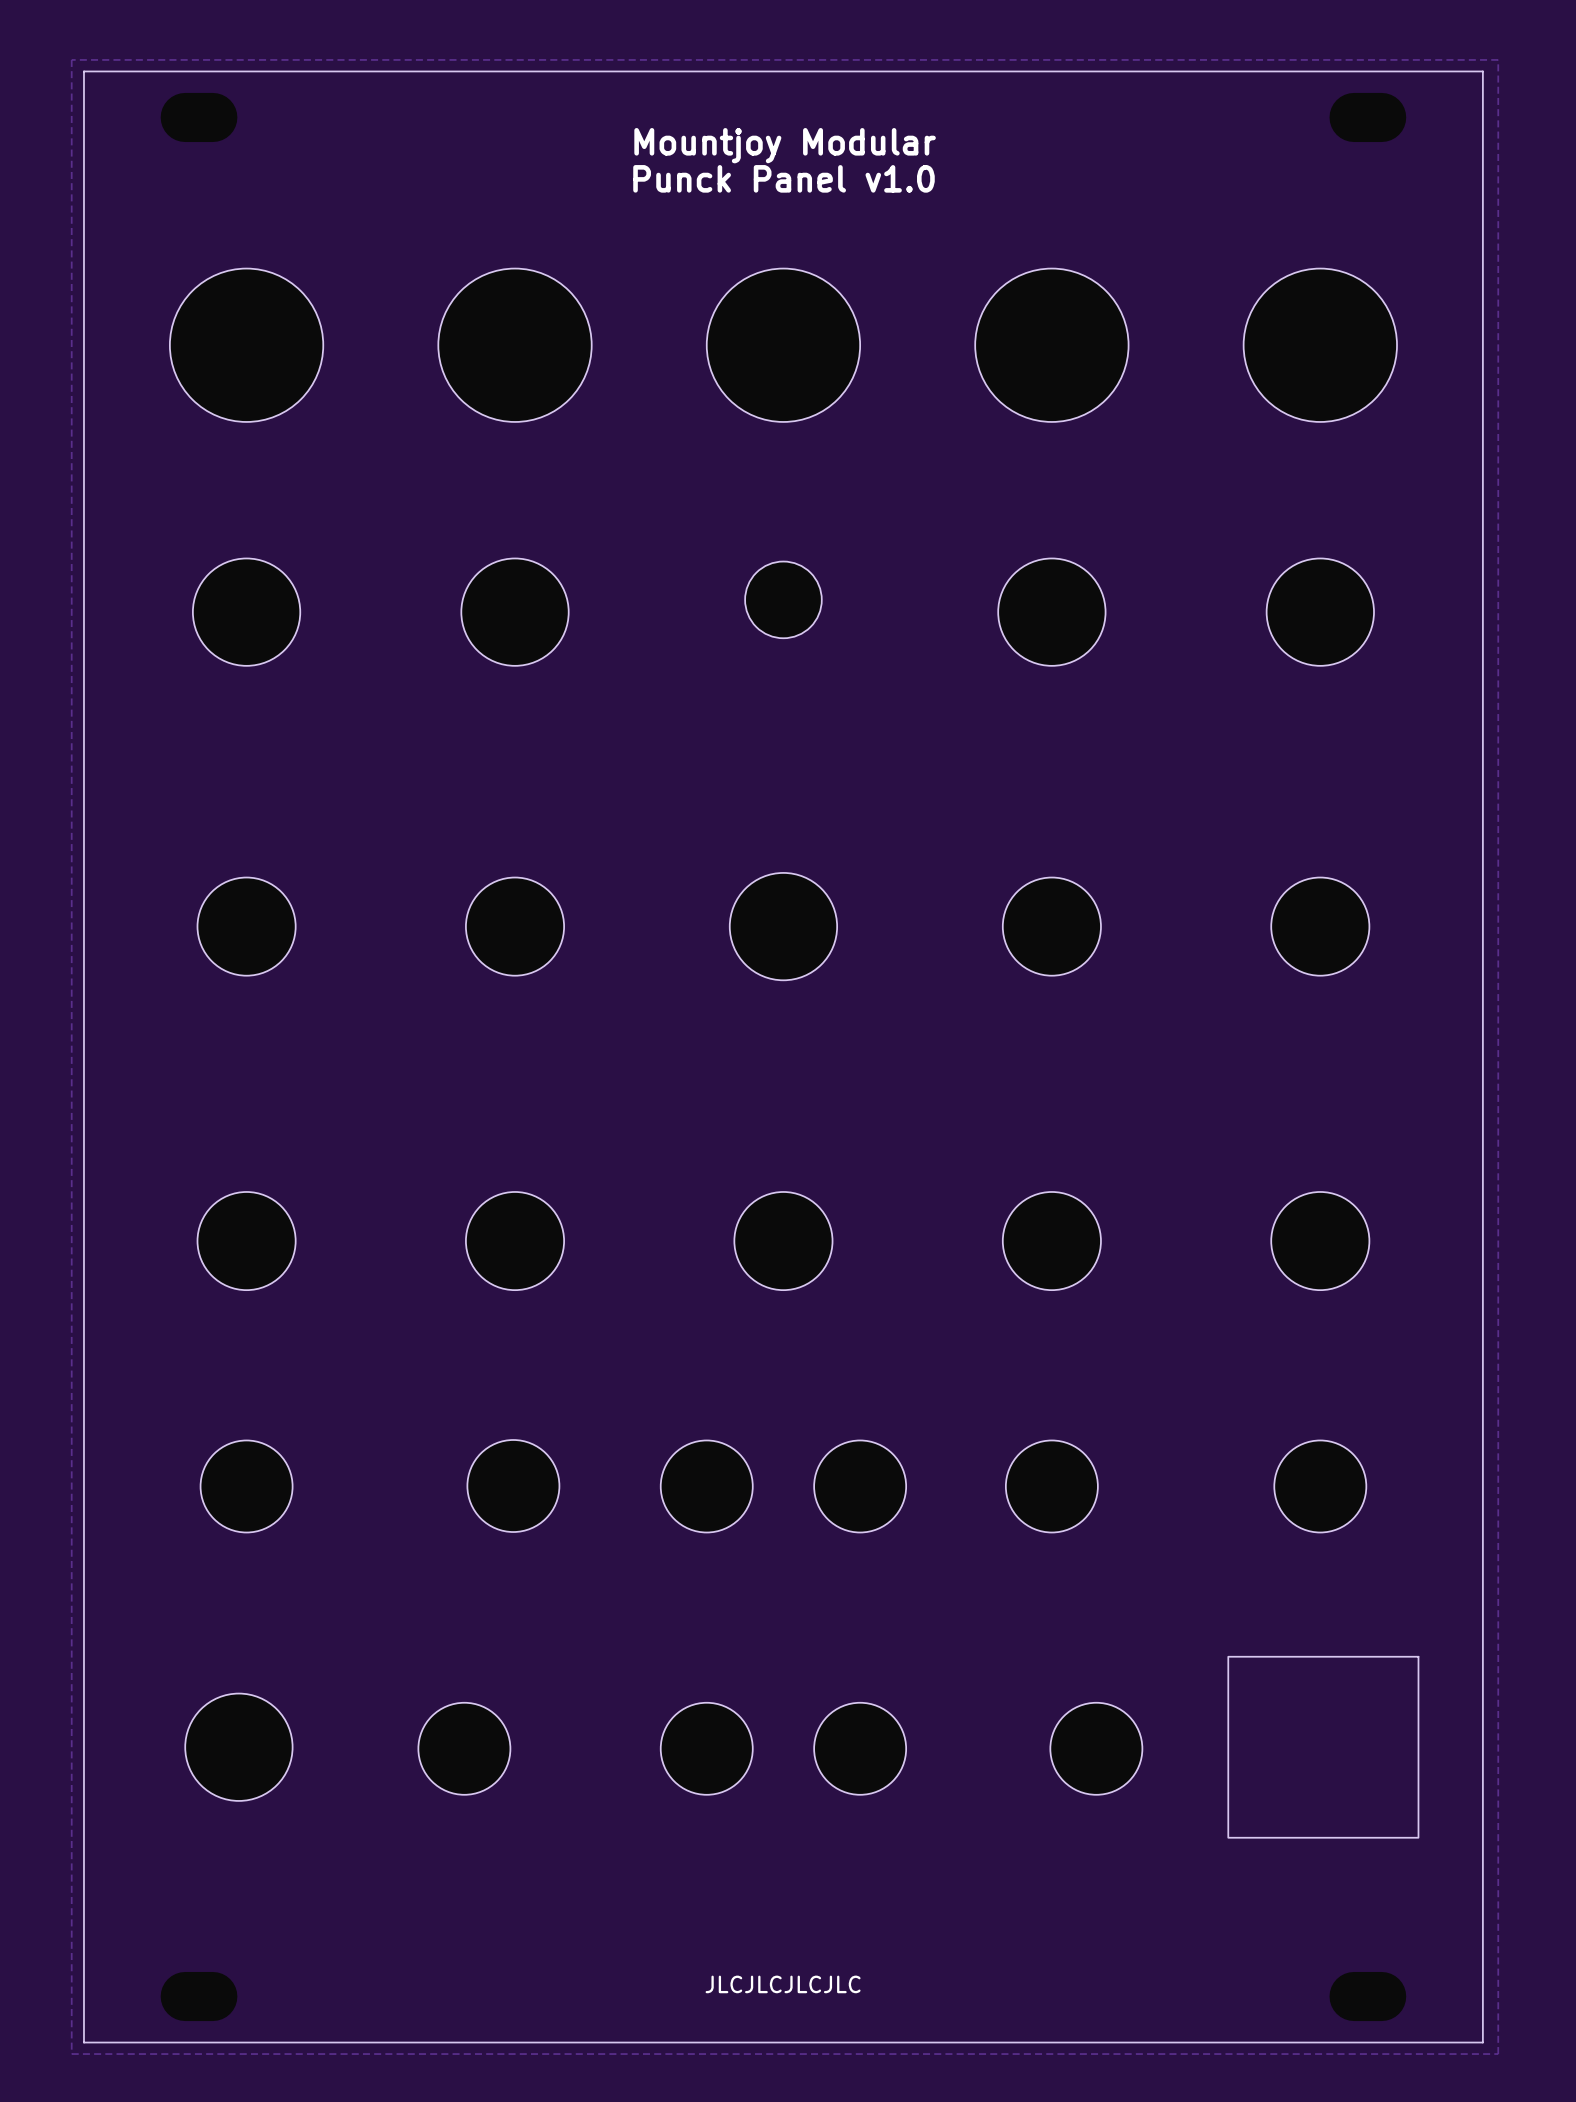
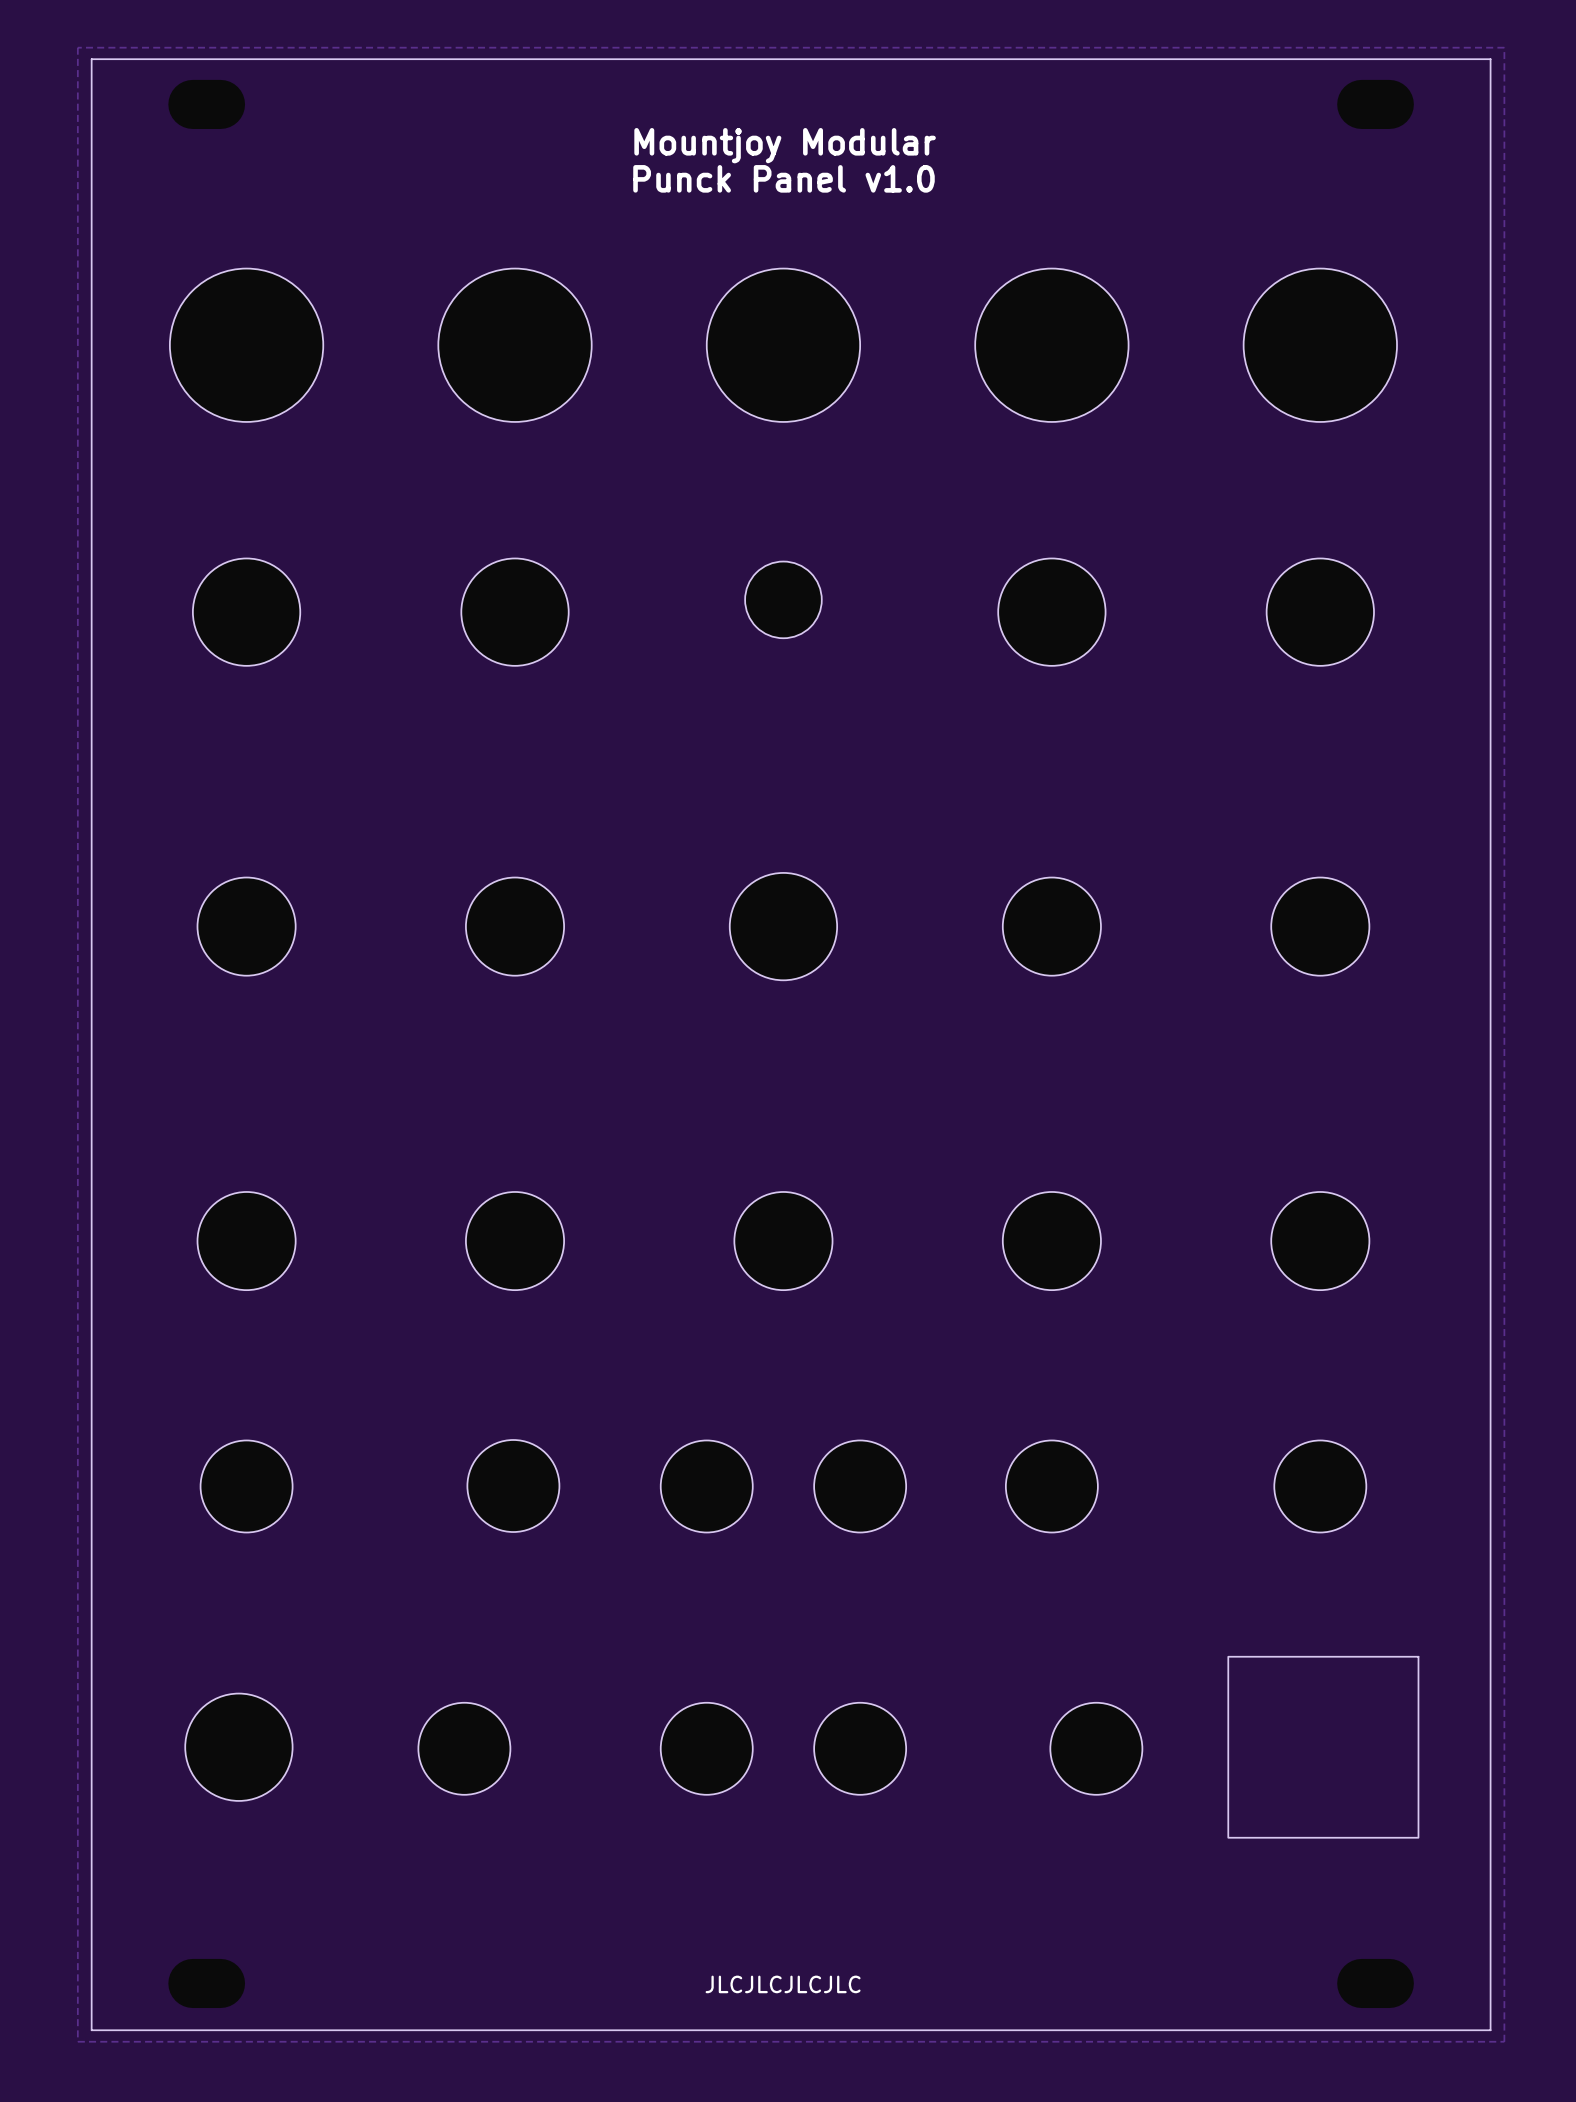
zone outline: (1498, 59) (1498, 2054) (71, 2054) (71, 59) (1498, 59) -> (1504, 47) (1504, 2041) (77, 2041) (77, 47) (1504, 47)
board edge: (1482, 71) (83, 71) (83, 2042) (1482, 2042) (1482, 71) -> (1490, 59) (91, 59) (91, 2030) (1490, 2030) (1490, 59)
part position: (199, 117) -> (206, 104)
part position: (1367, 117) -> (1375, 104)
part position: (199, 1996) -> (206, 1983)
part position: (1367, 1996) -> (1375, 1983)

